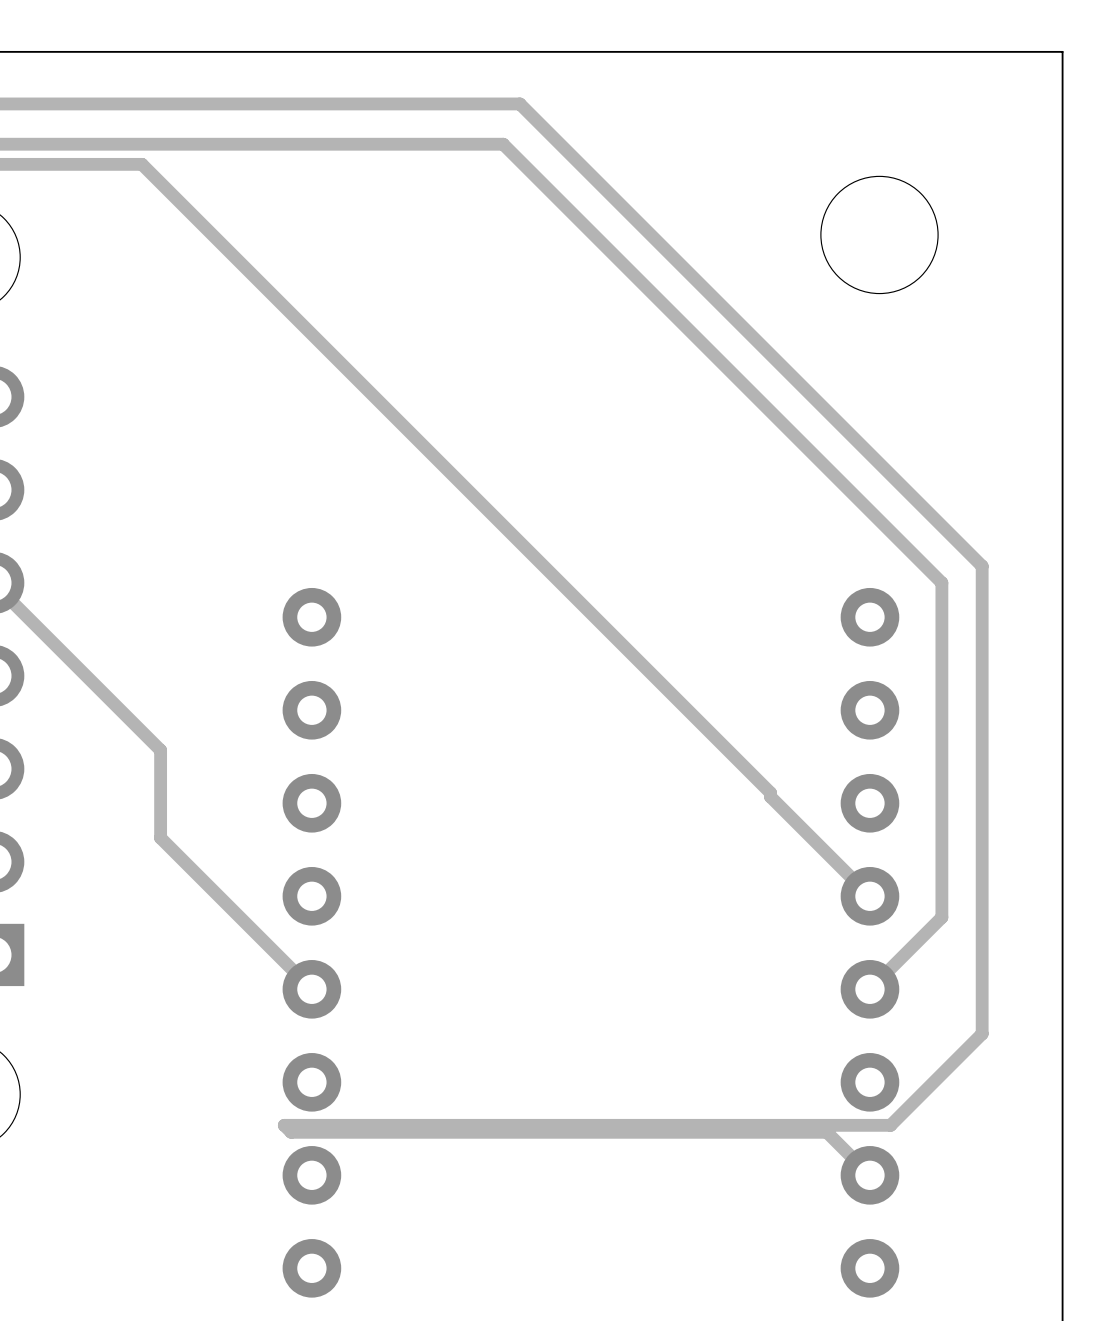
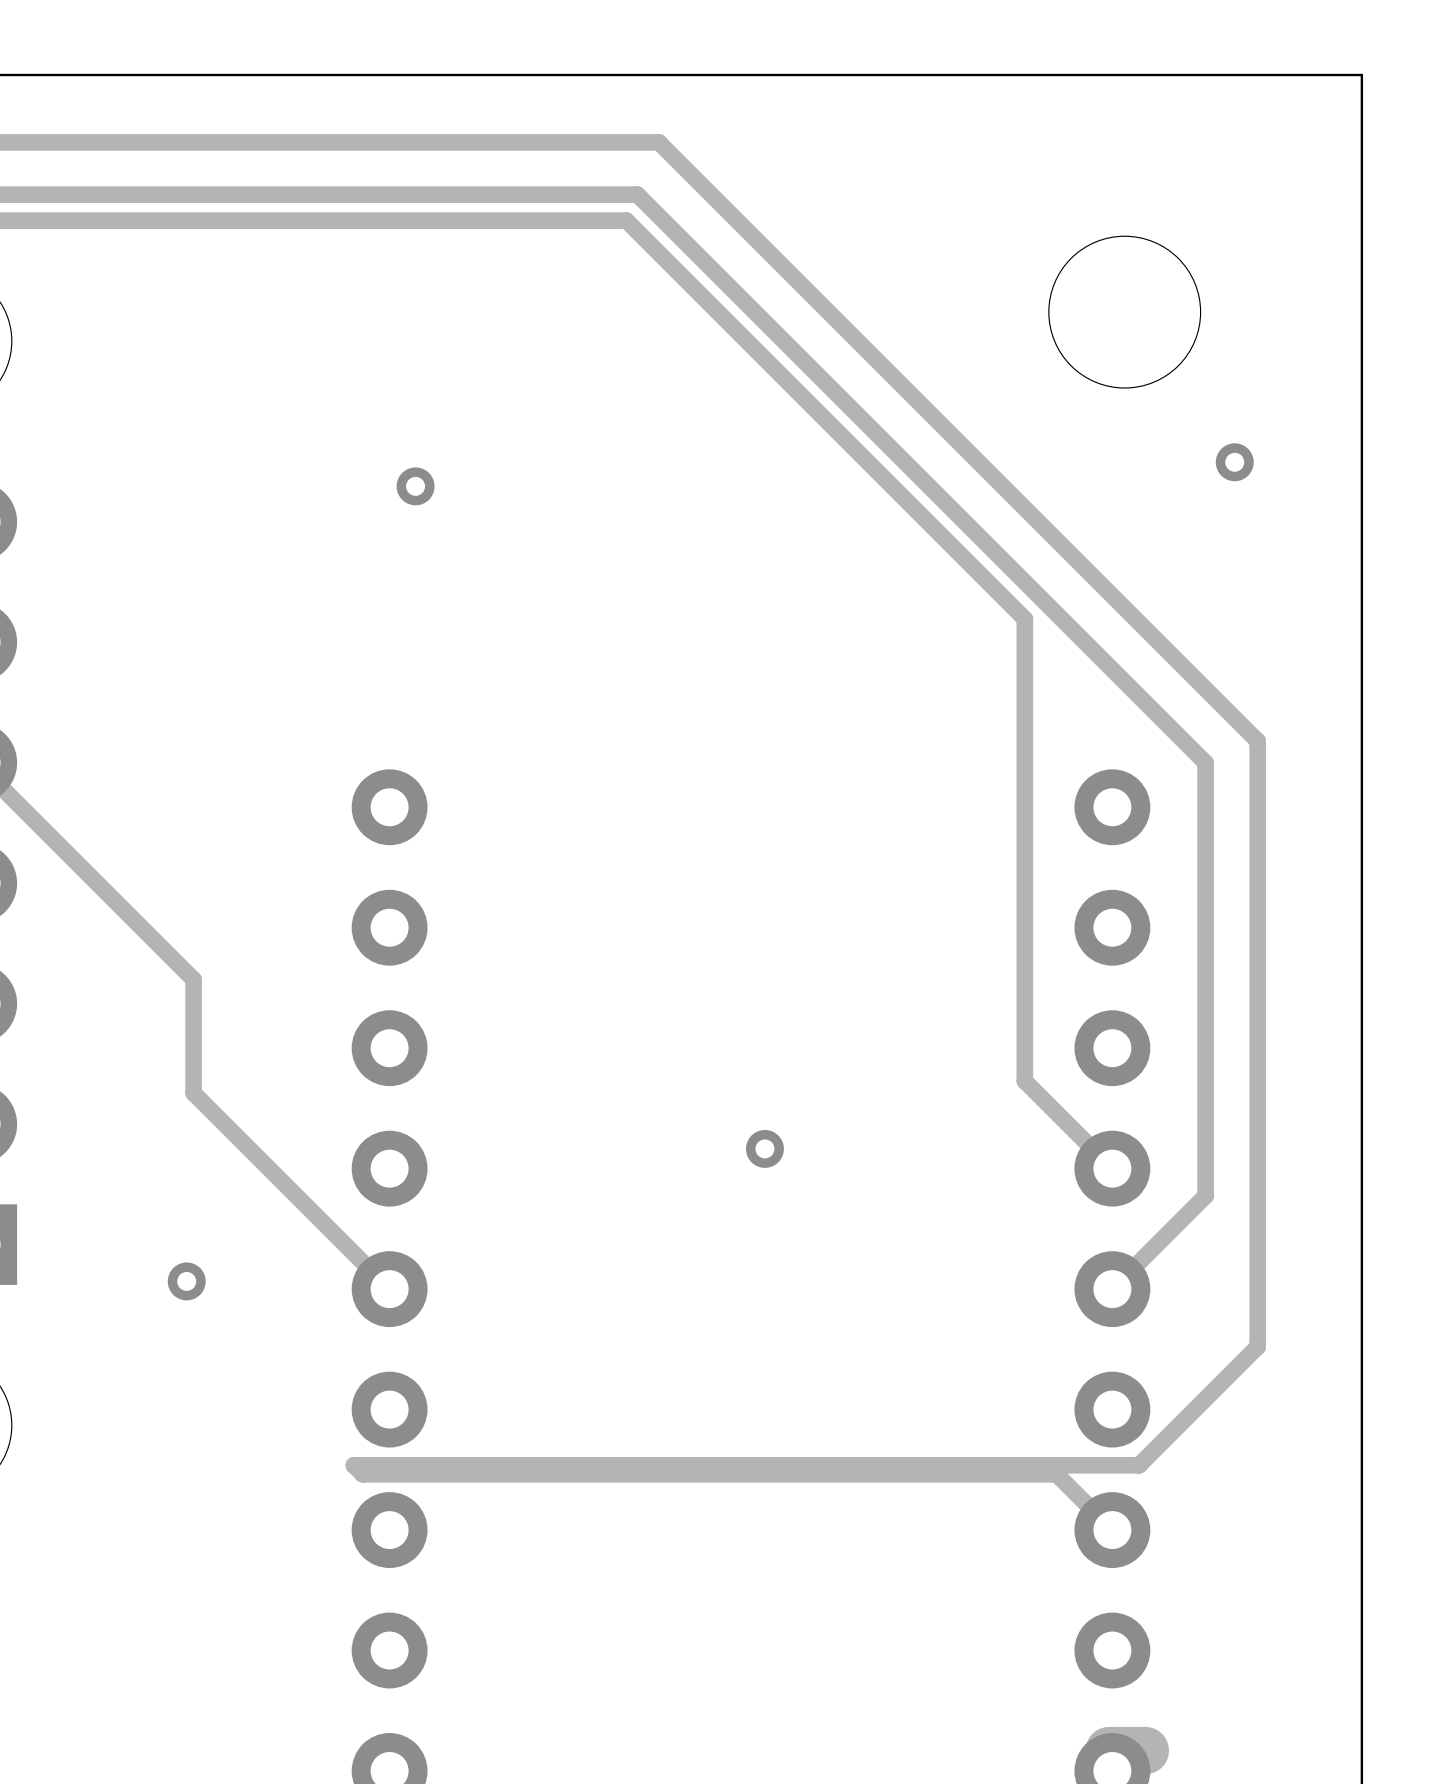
track: (142, 164) (770, 792) (770, 796) (802, 828) -> (169, 220) (626, 220) (1024, 618) (1024, 1081)
via: none -> (1234, 462)
via: none -> (415, 486)
via: none -> (764, 1148)
via: none -> (186, 1281)

